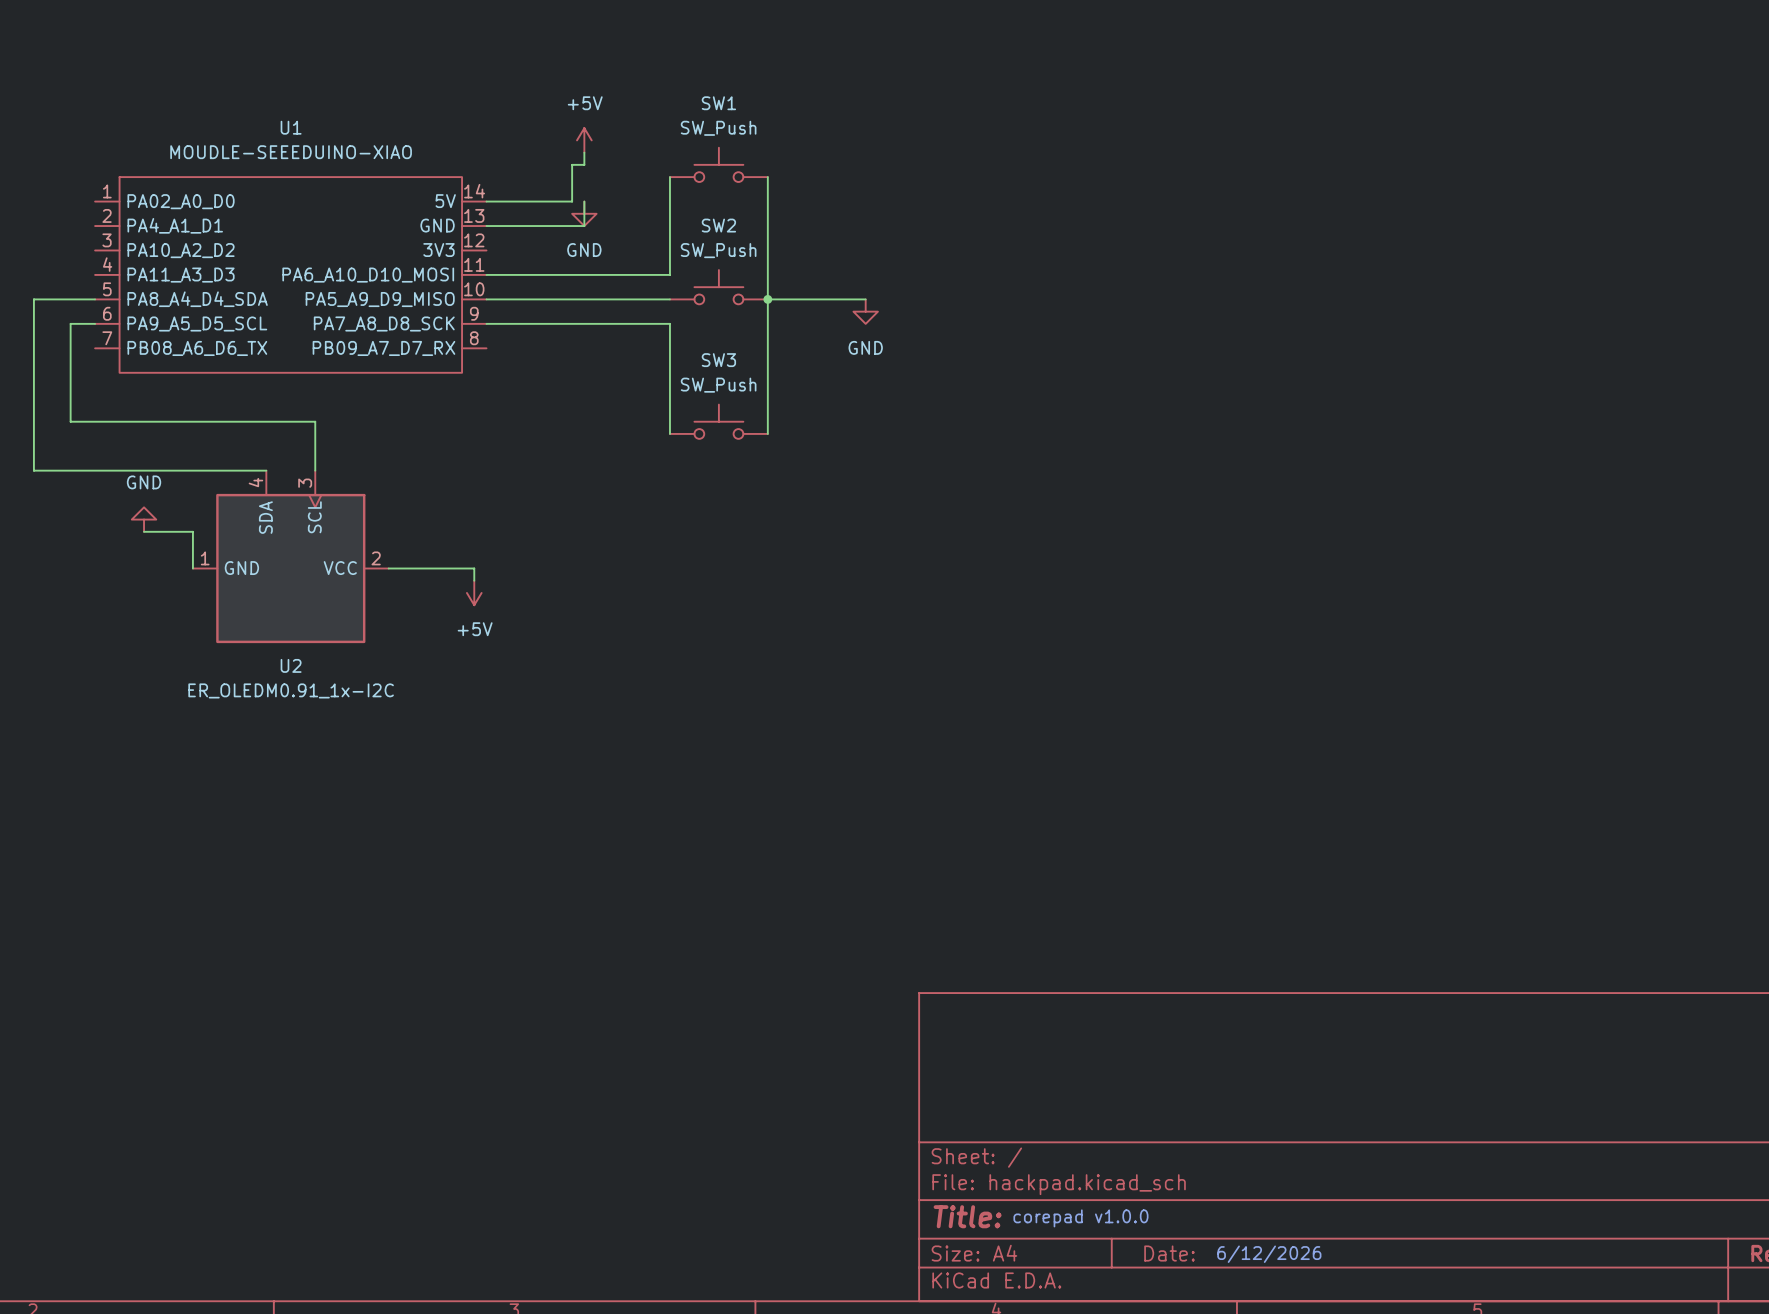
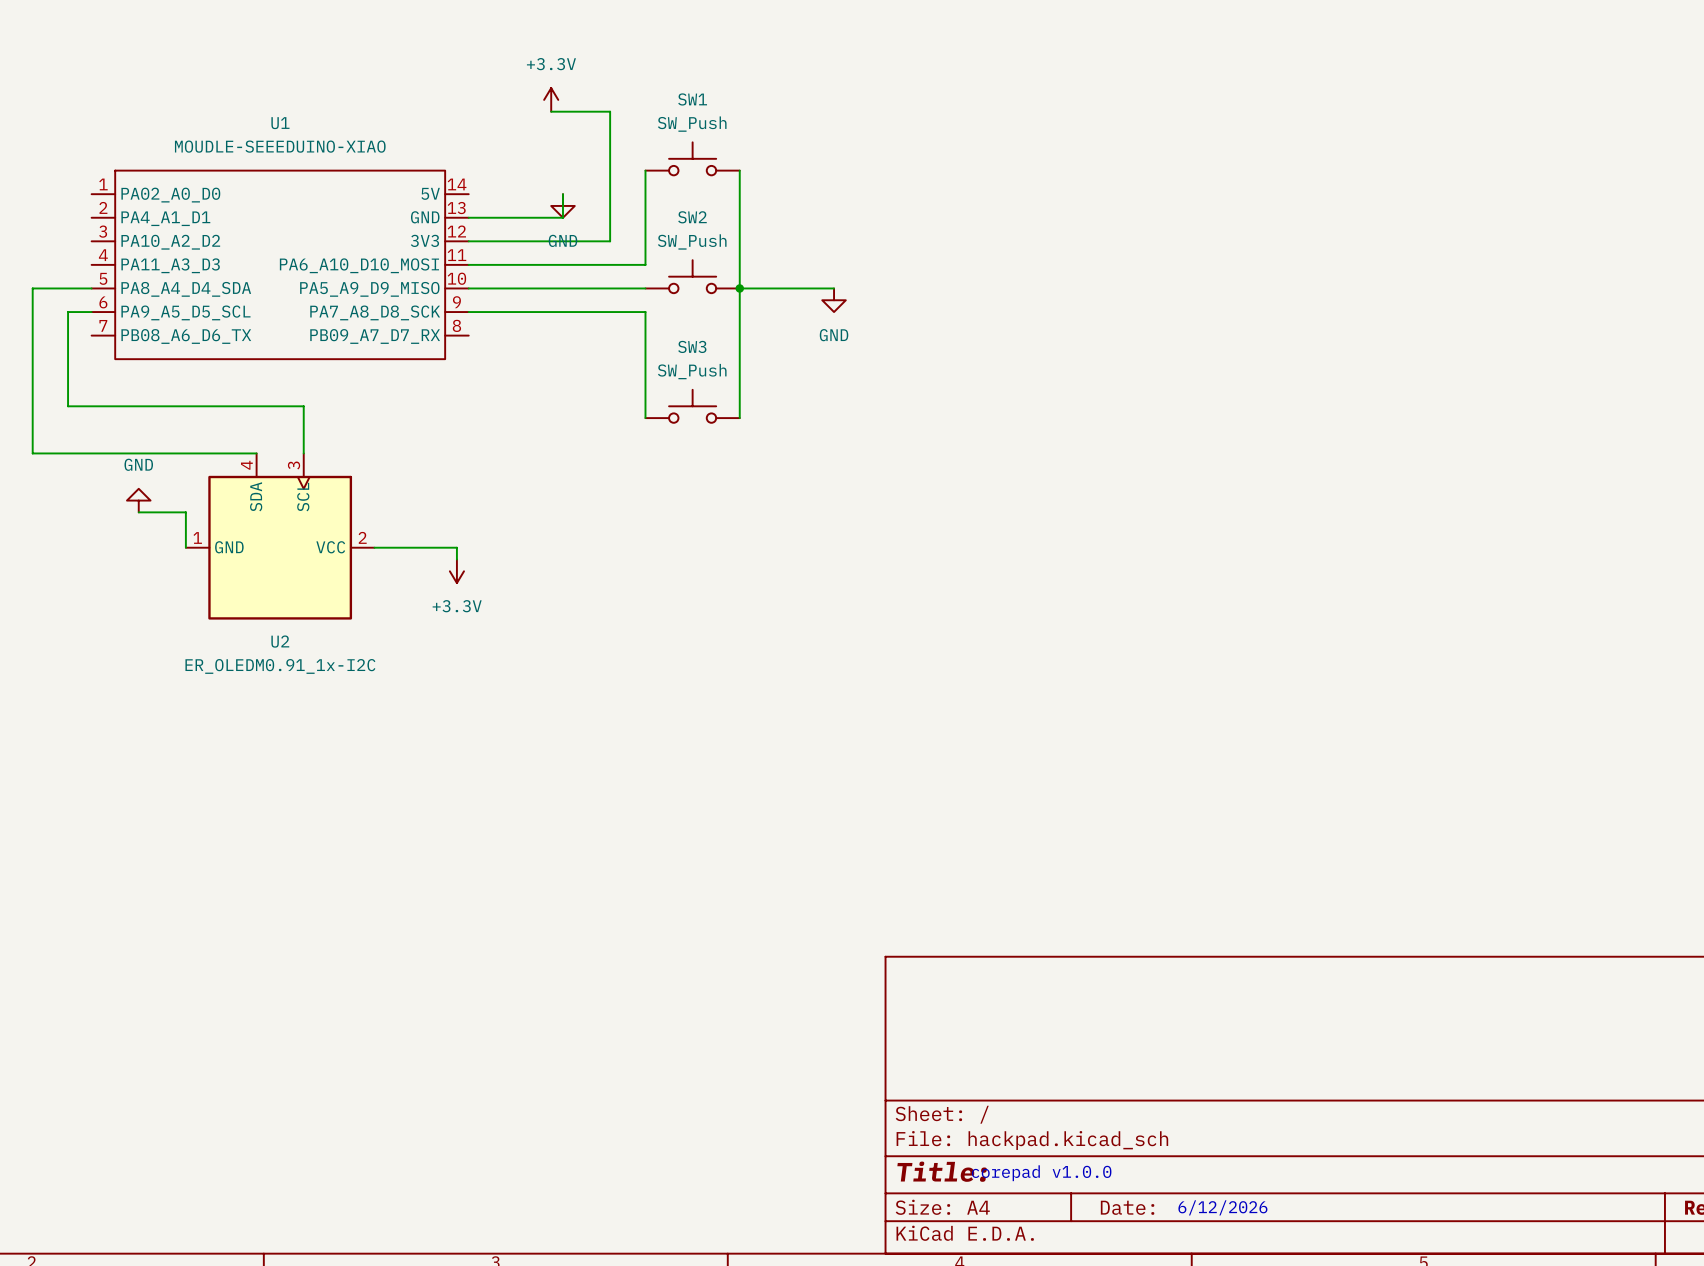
power symbol: none -> +3.3V (551, 99)
wire: none -> (551, 111) (610, 111) (610, 241) (468, 241)
power symbol: +5V (584, 140) -> none
wire: (584, 152) (584, 164) (572, 164) (572, 201) (486, 201) -> none
power symbol: +5V (474, 592) -> +3.3V (456, 571)

